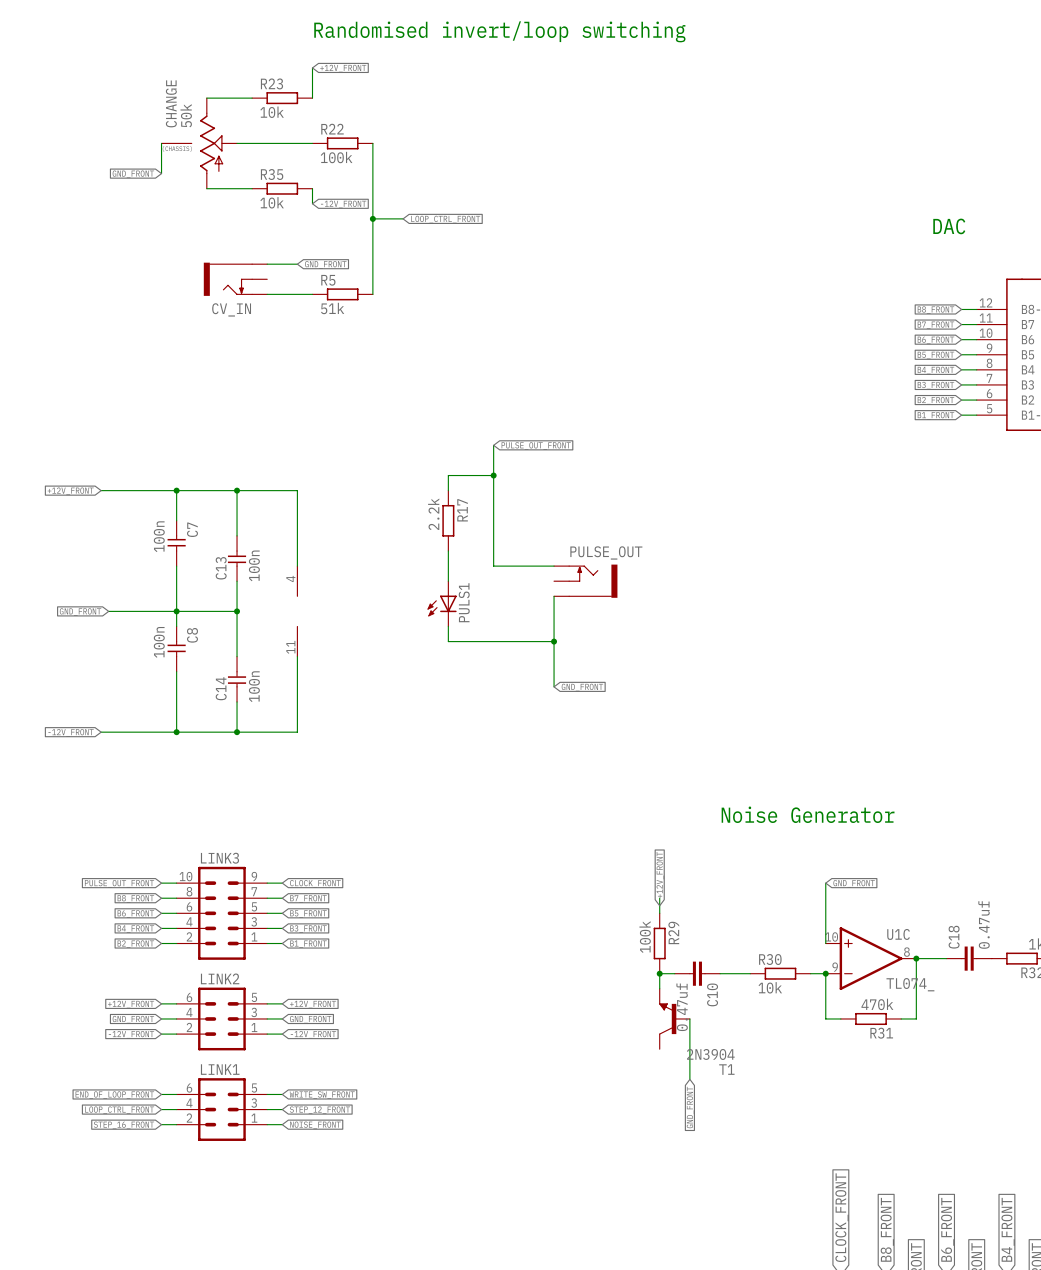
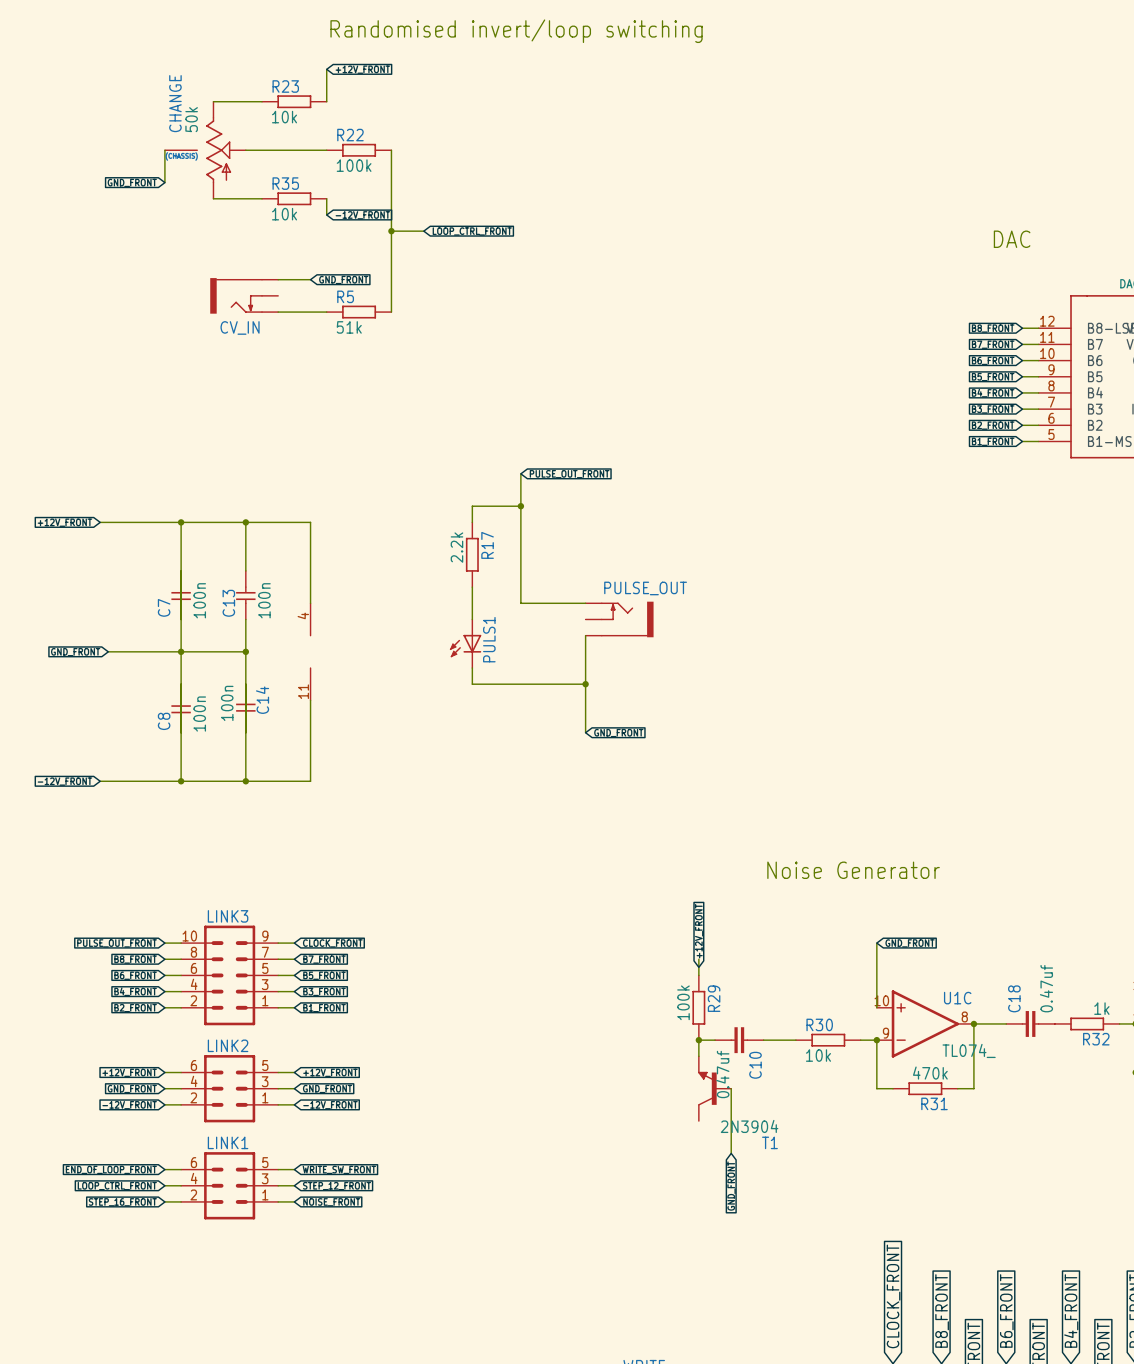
C7 rotation: 0° (176, 543) -> 180° (181, 595)
C8 rotation: 0° (176, 649) -> 180° (181, 708)
C14 rotation: 0° (237, 679) -> 180° (245, 708)

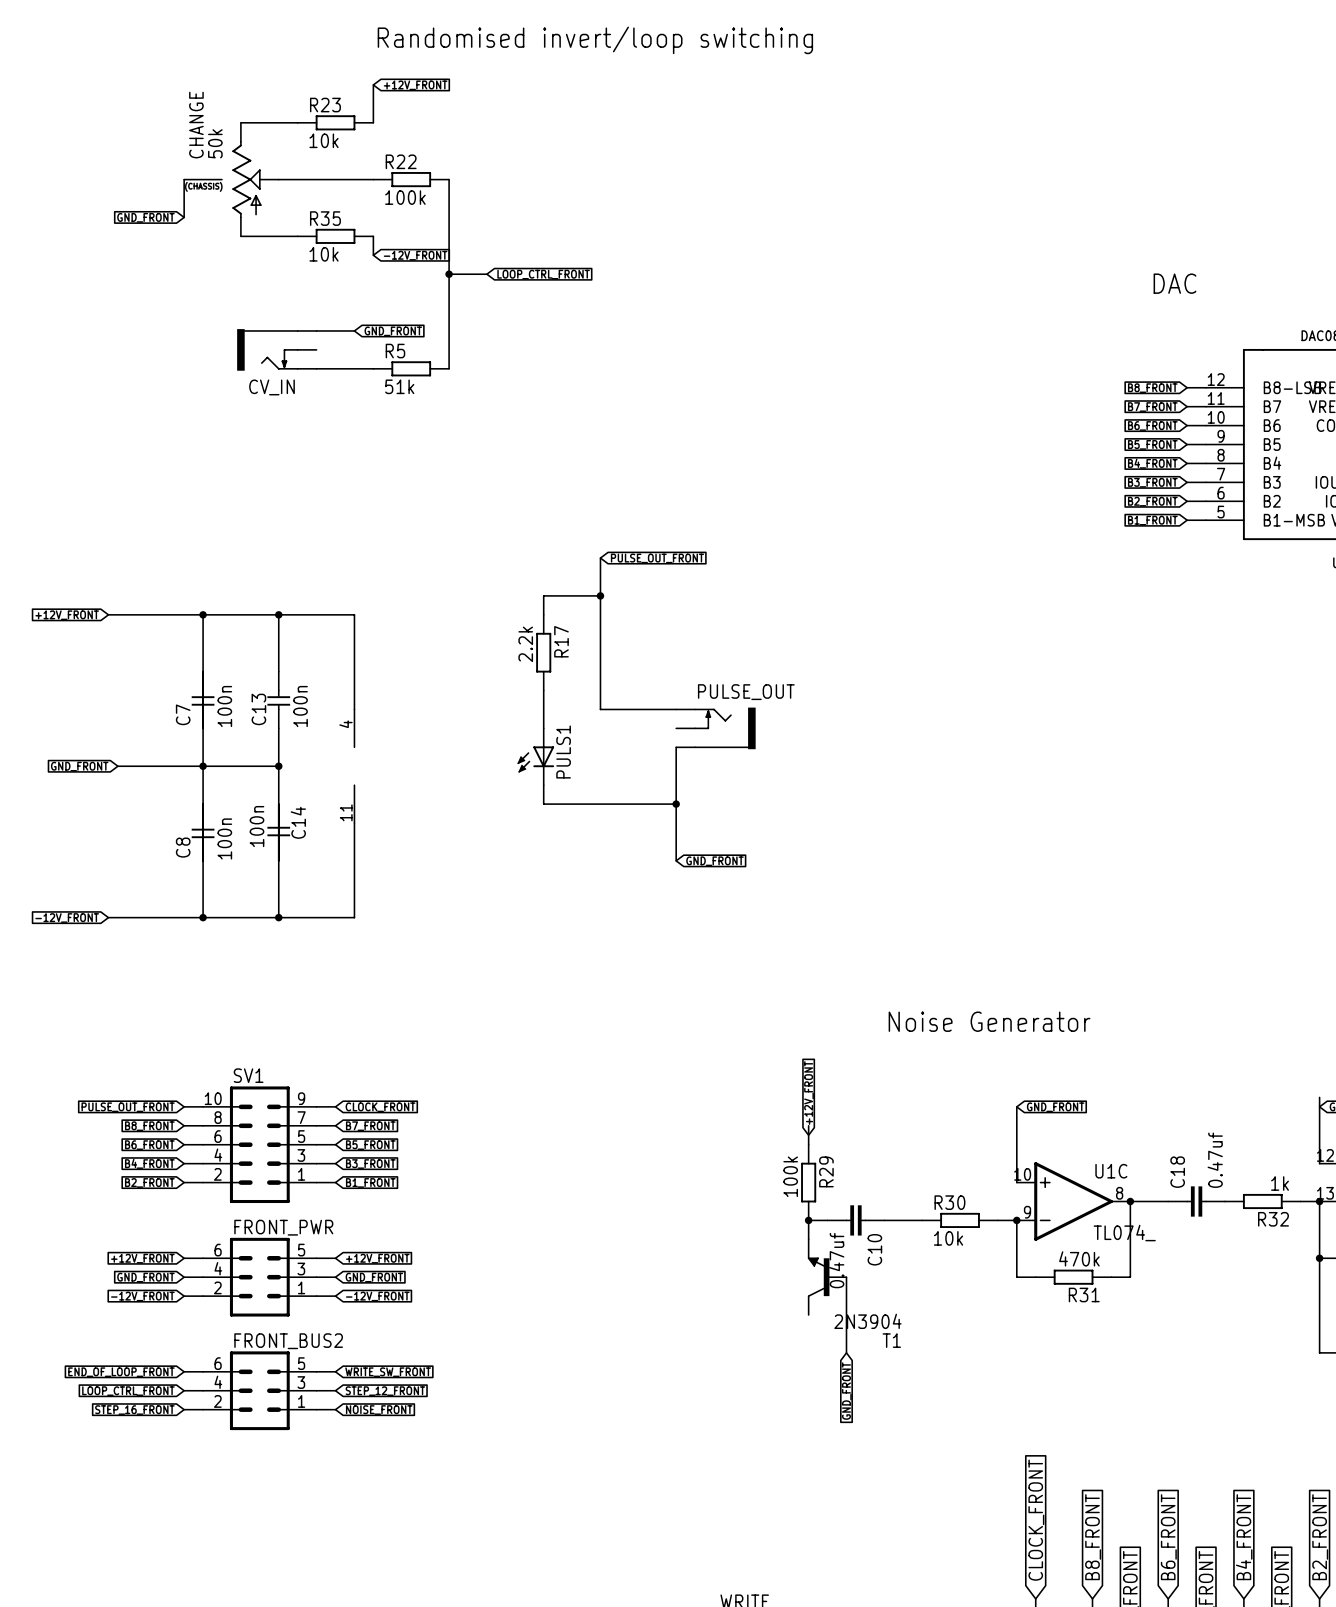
LINK3 name: LINK3 (228, 916) -> SV1 (248, 1075)
LINK2 name: LINK2 (228, 1045) -> FRONT_PWR (283, 1227)
LINK1 name: LINK1 (228, 1142) -> FRONT_BUS2 (288, 1341)

